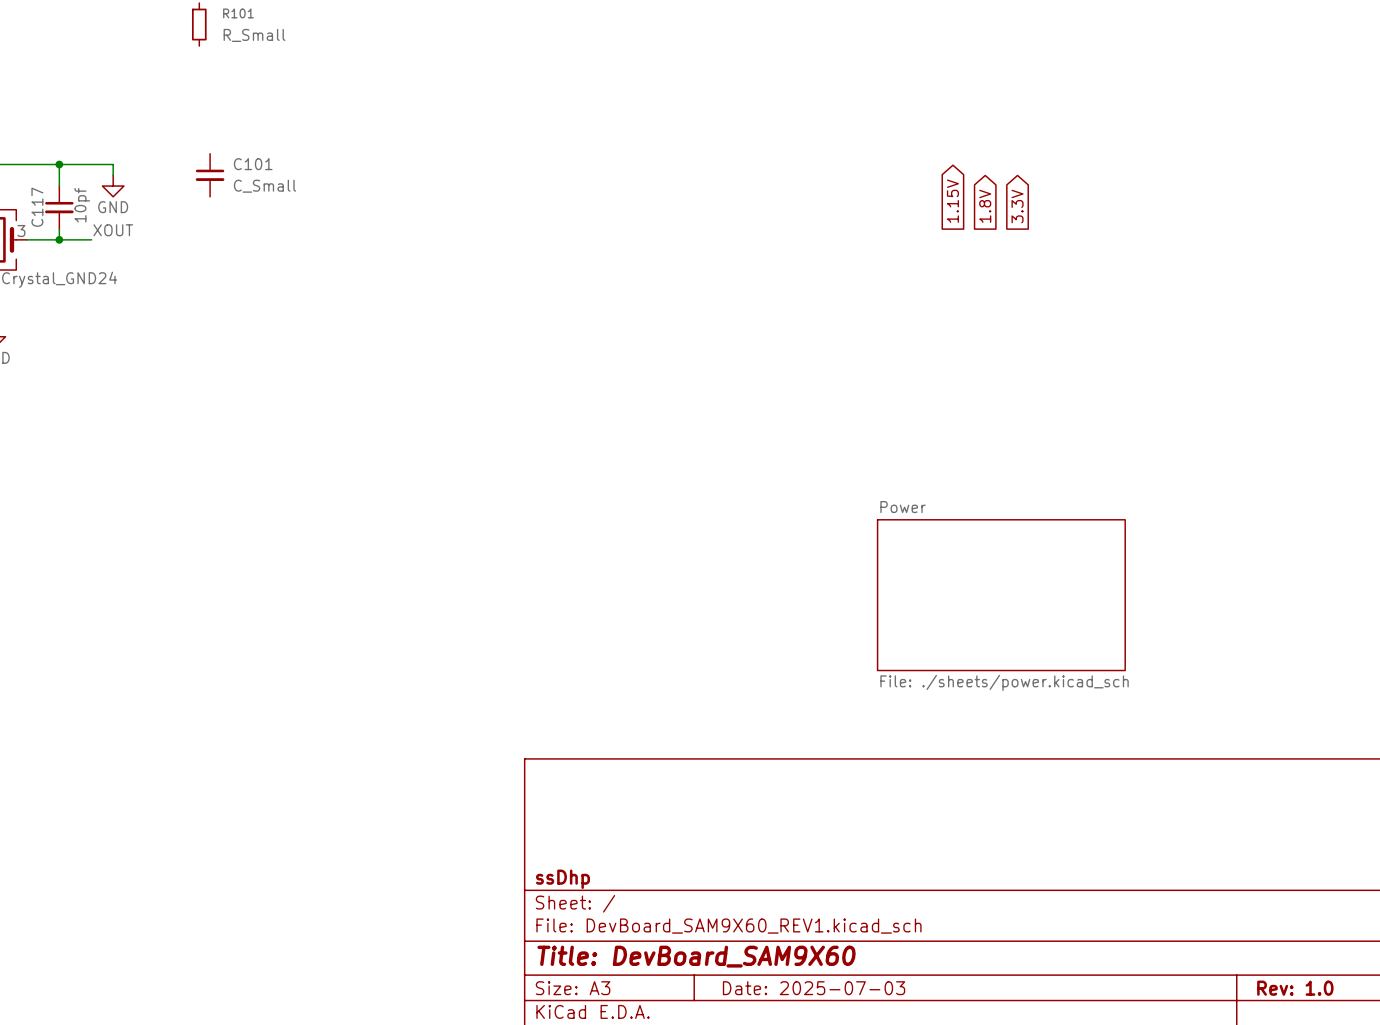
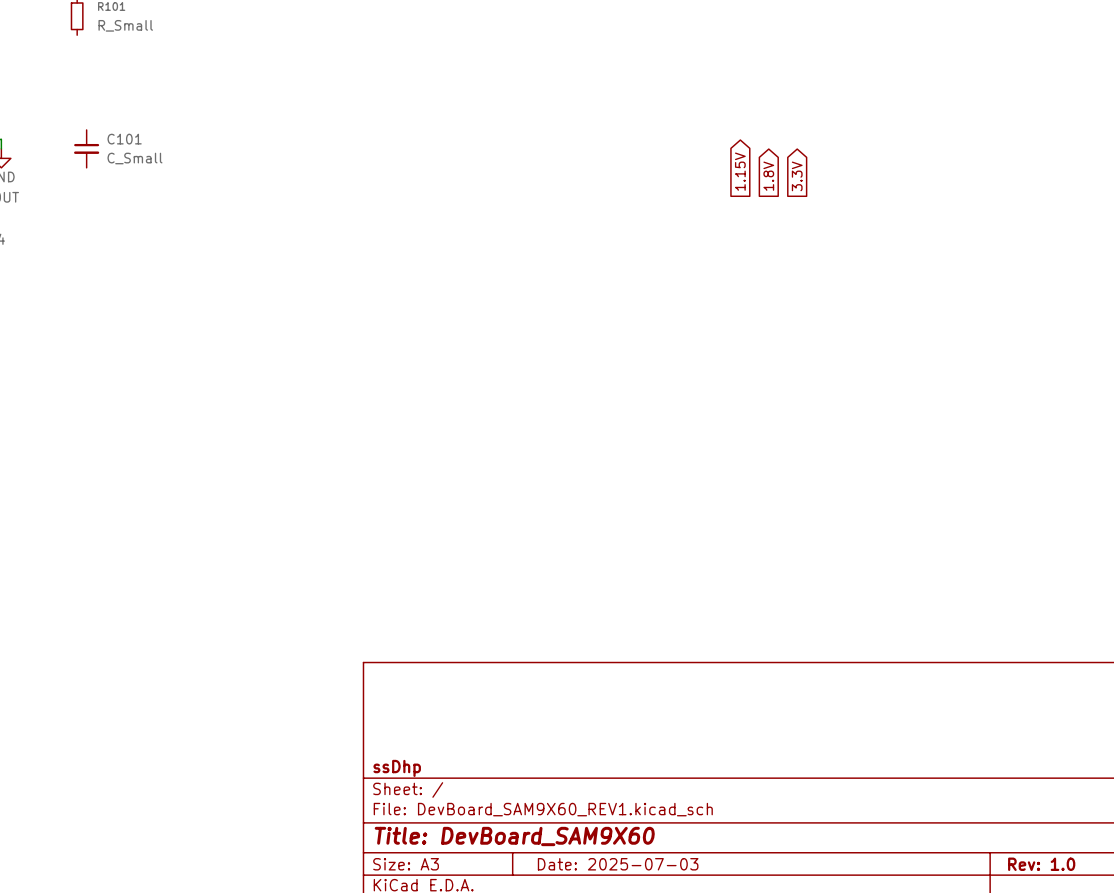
sheet Power: File: ./sheets/power.kicad_sch (1001, 595) -> none

